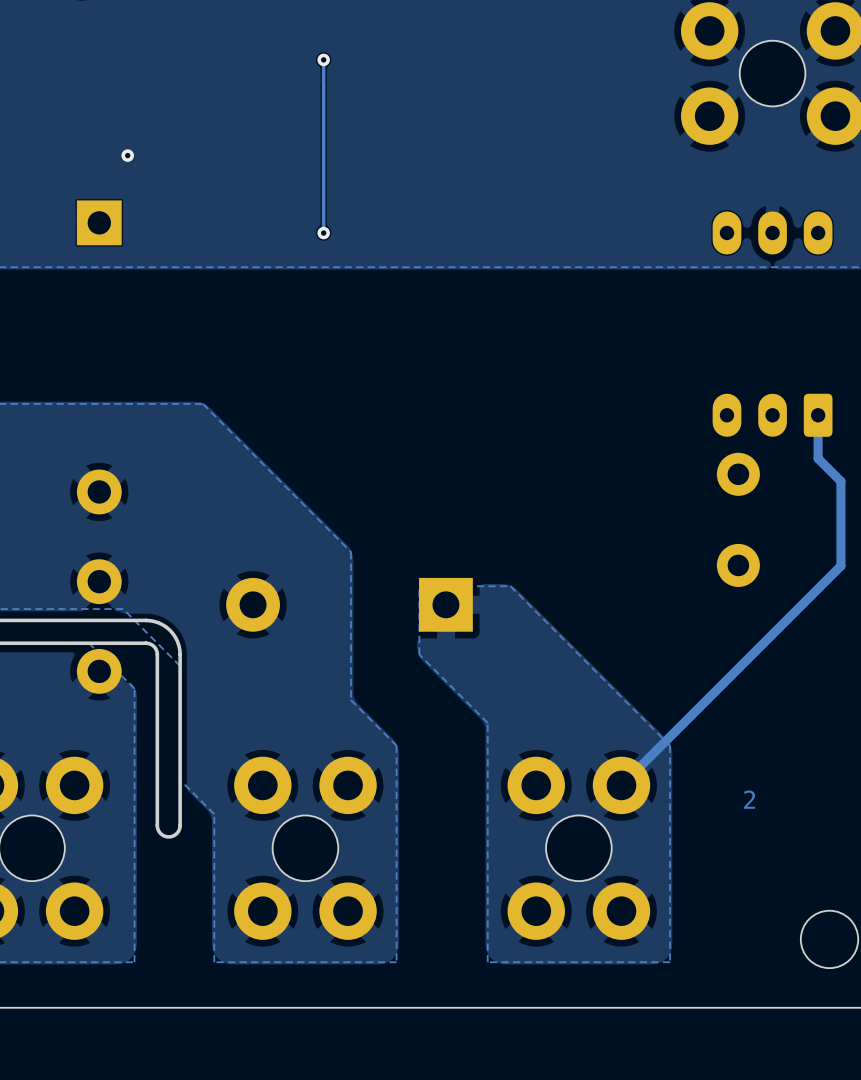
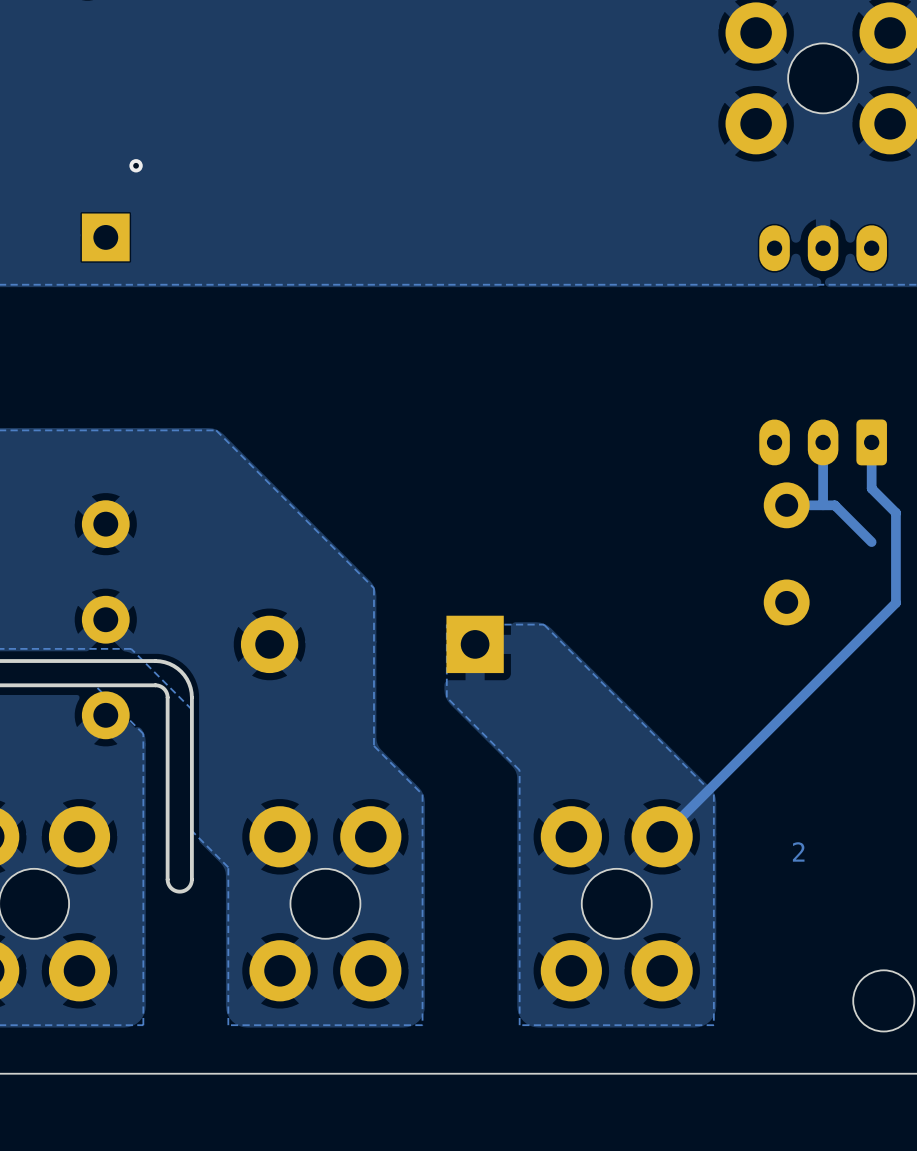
track: (323, 59) (323, 233) -> none
via: (323, 59) -> none
via: (323, 233) -> none
track: none -> (823, 442) (823, 505)
track: none -> (786, 505) (834, 505) (871, 542)

